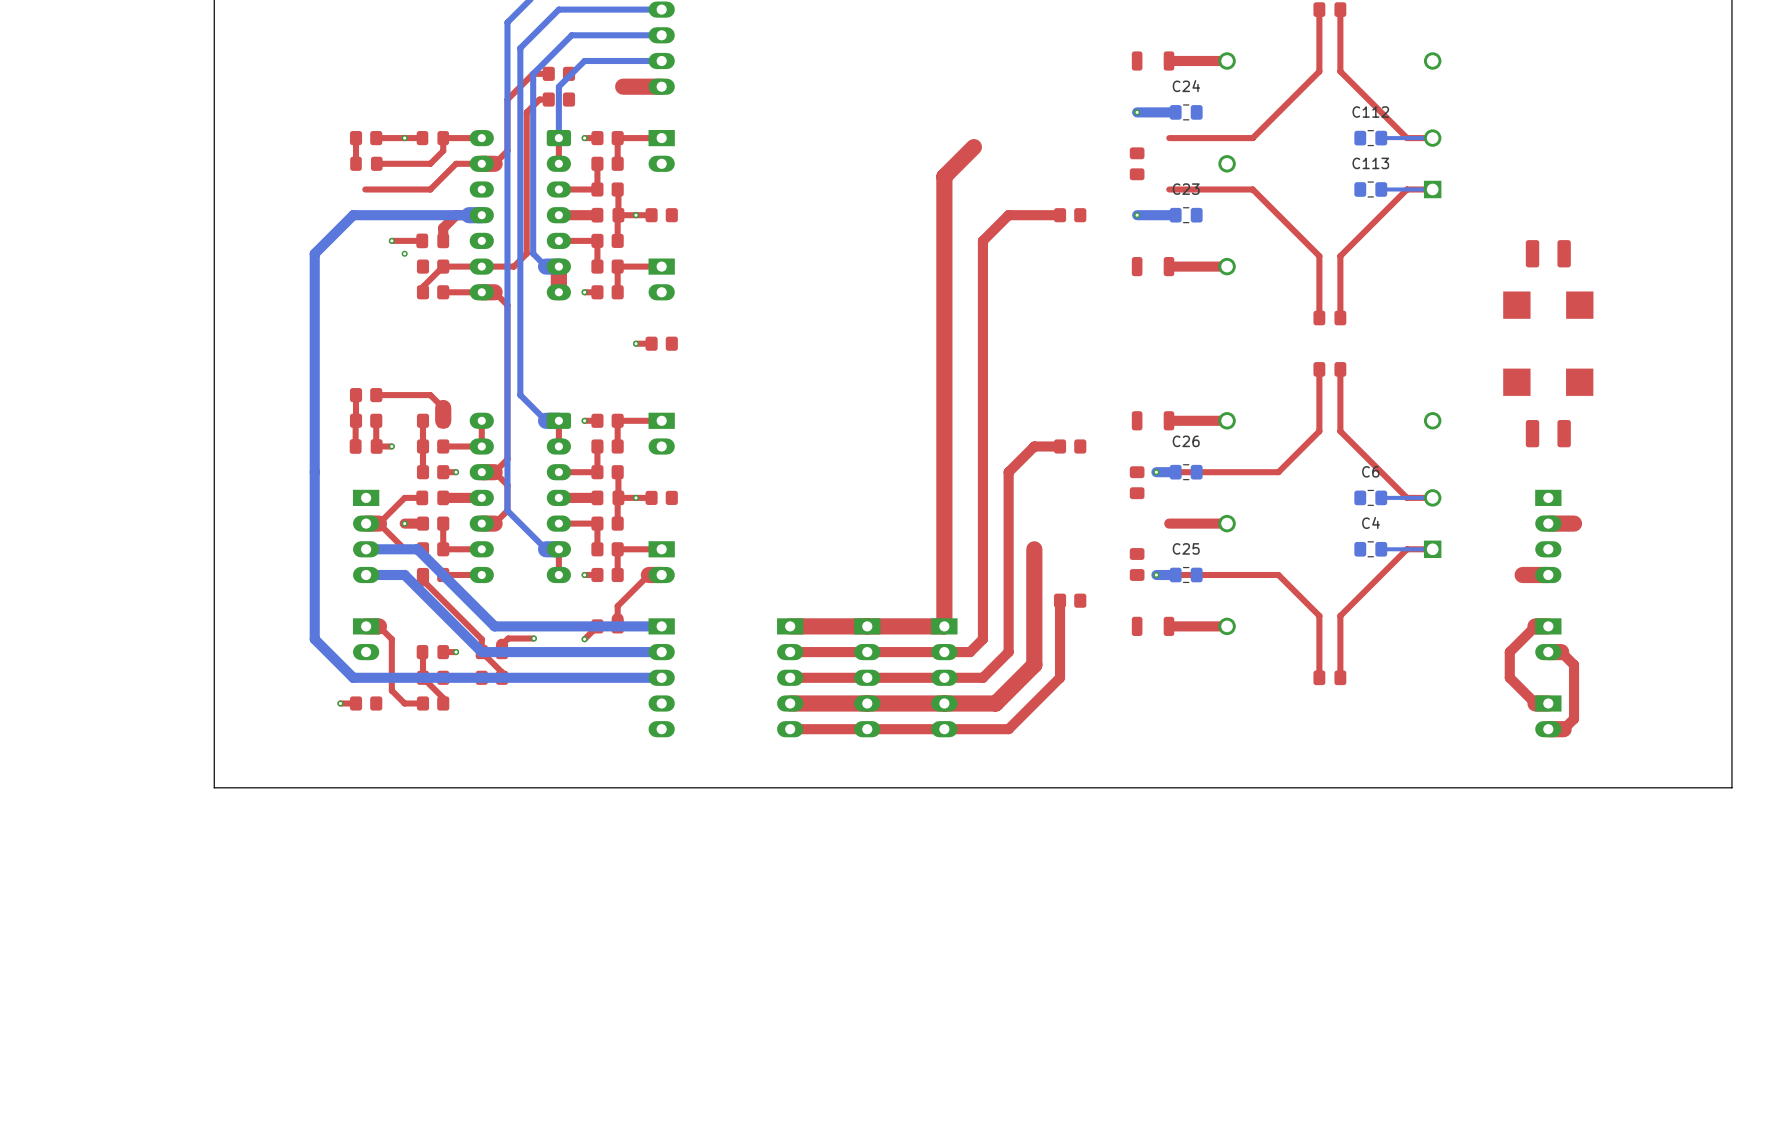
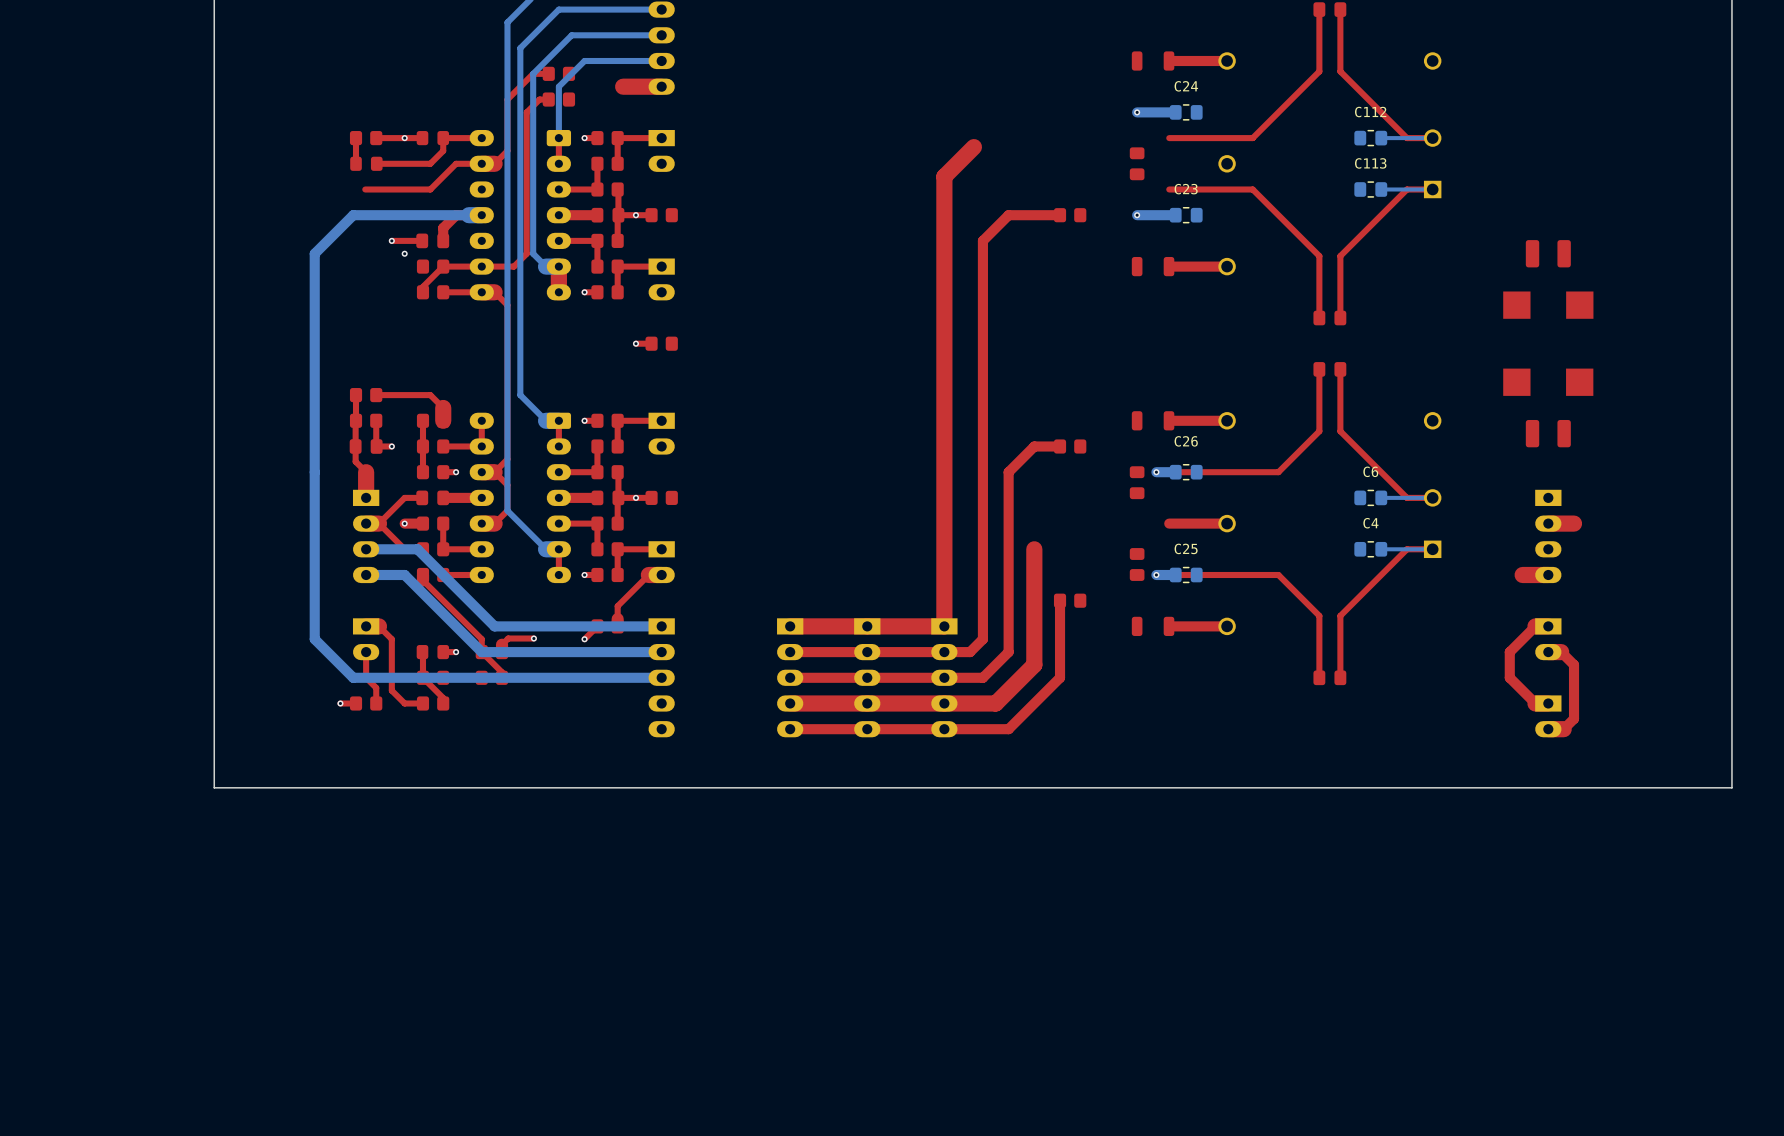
top track: none -> (355, 446) (355, 461) (366, 472) (366, 497)
top track: none -> (366, 652) (366, 677) (376, 687) (376, 703)

